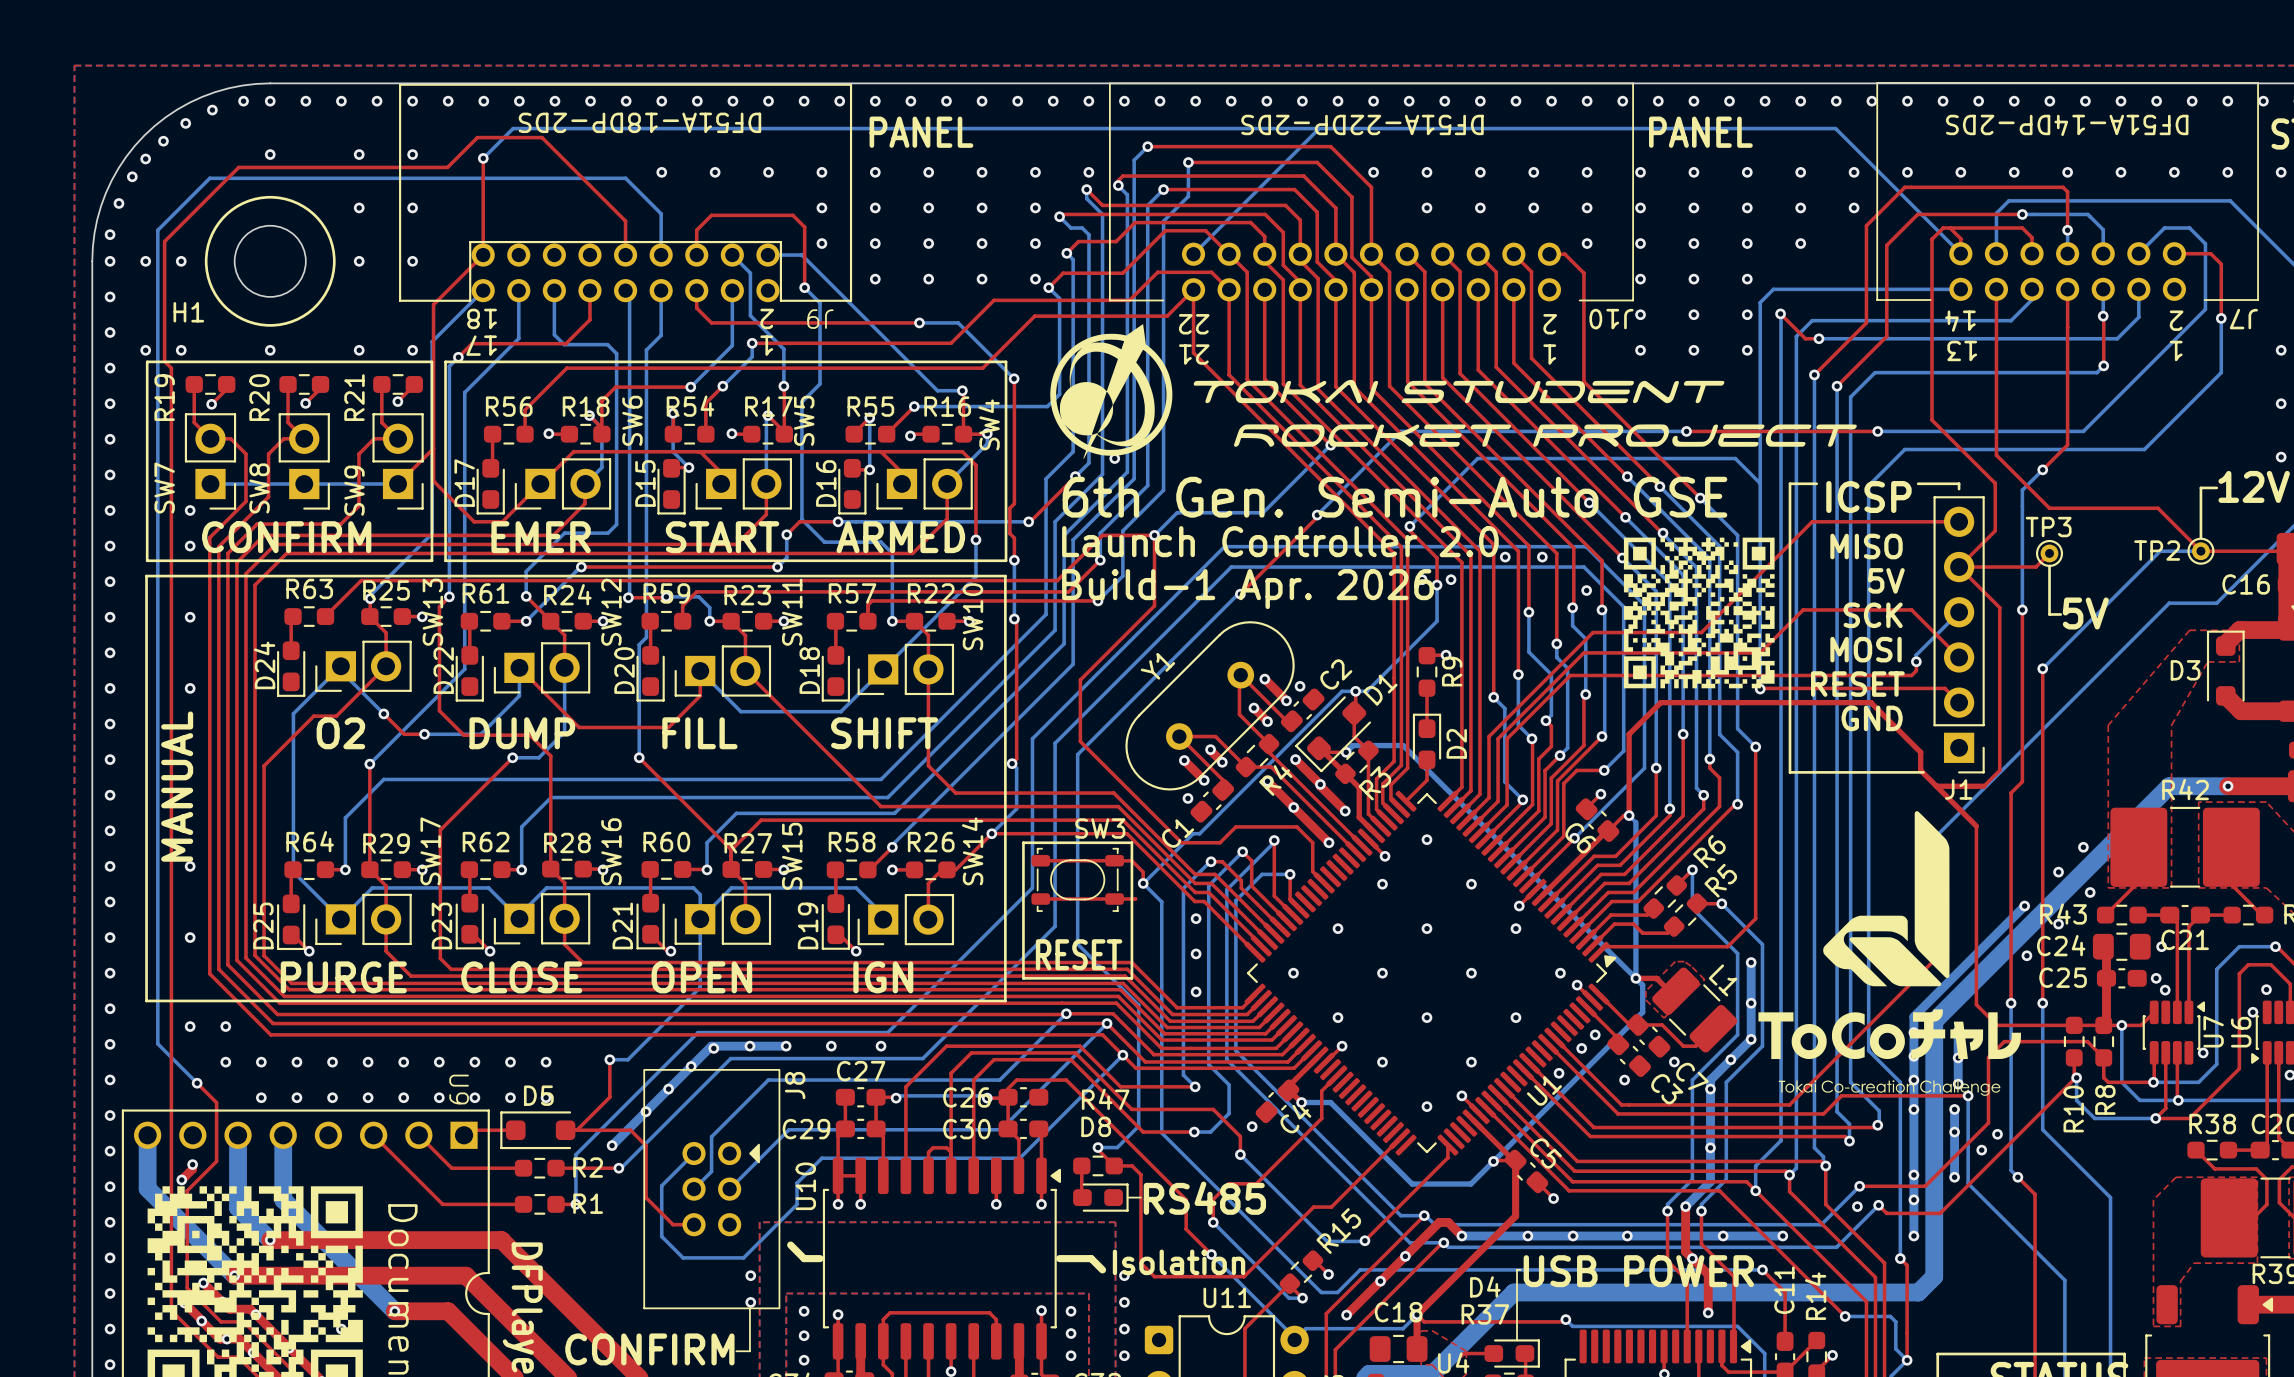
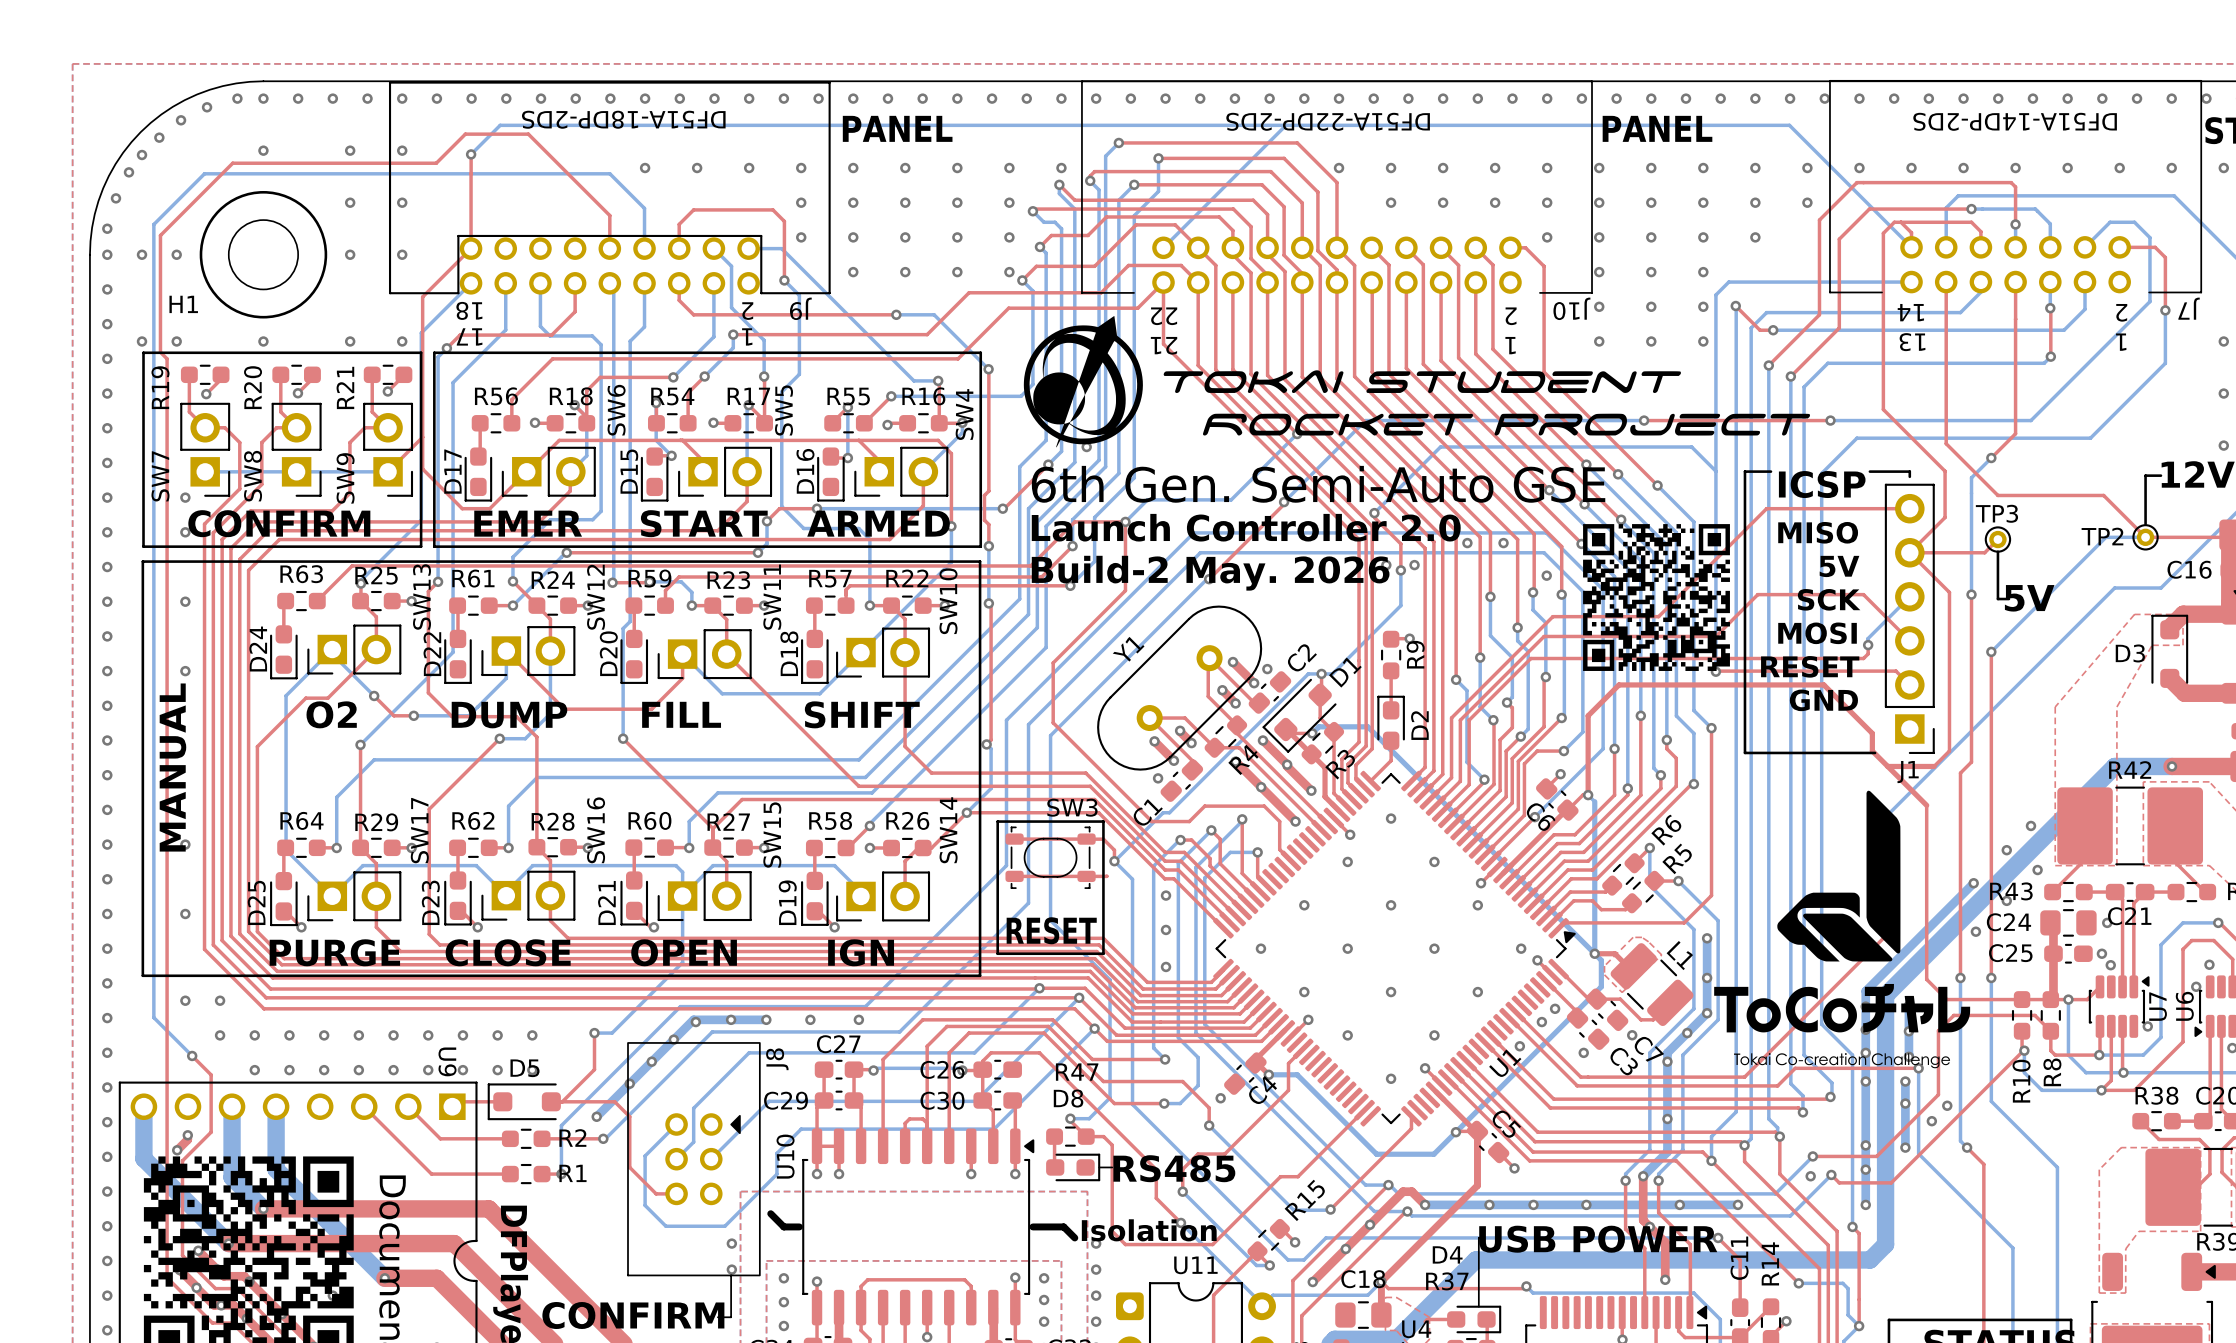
text: Build-1 Apr. 2026 (1248, 589) -> Build-2 May. 2026 (1210, 573)

